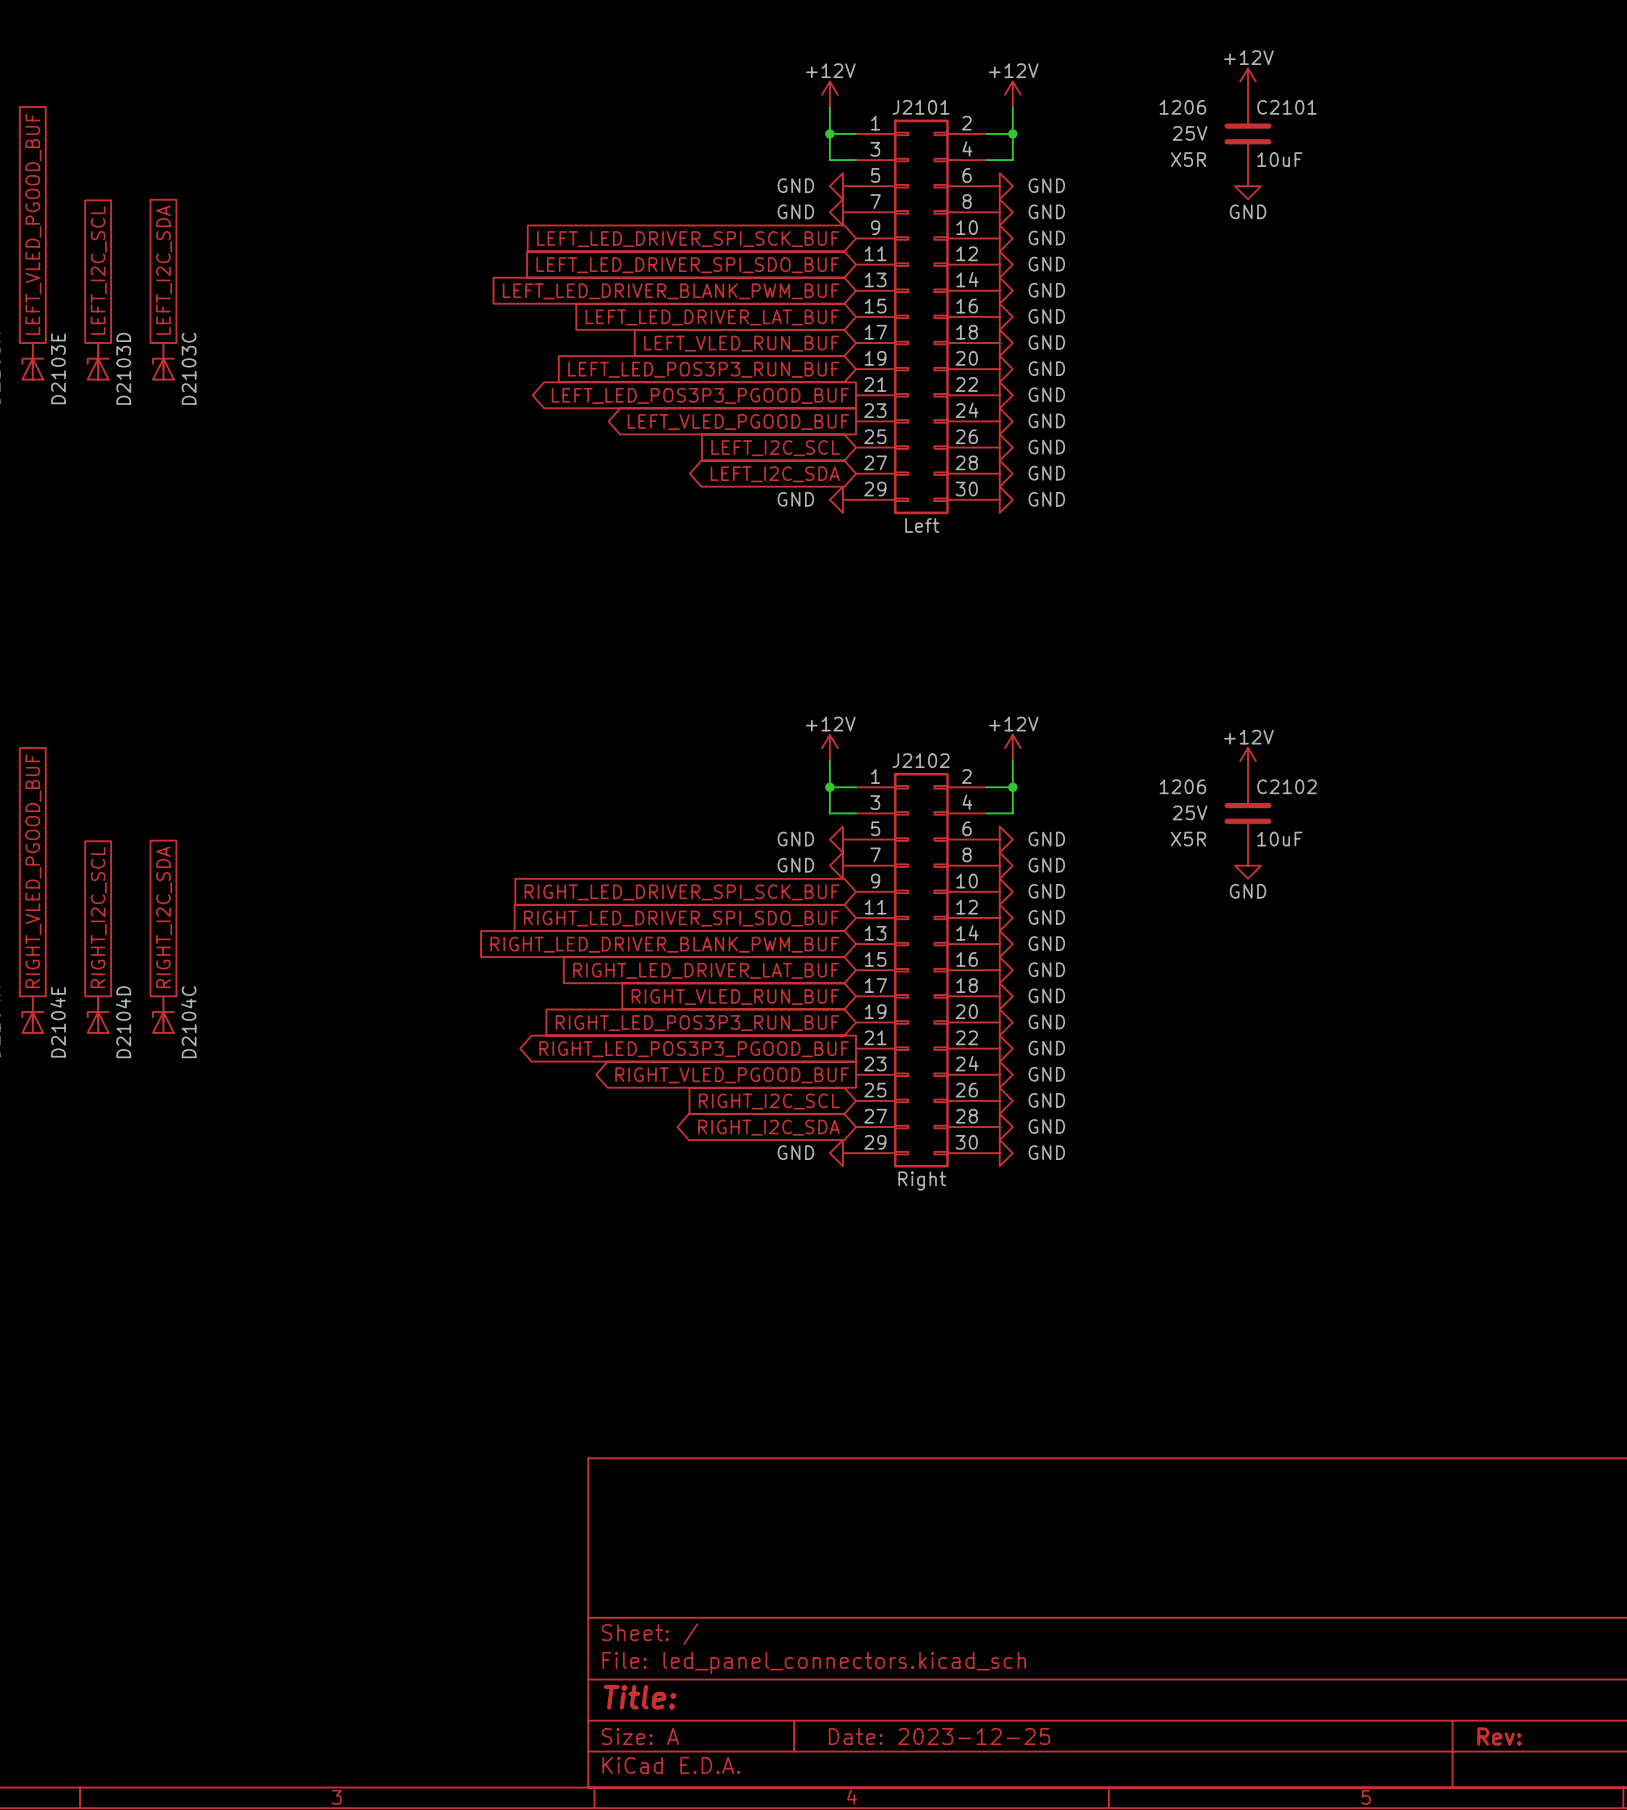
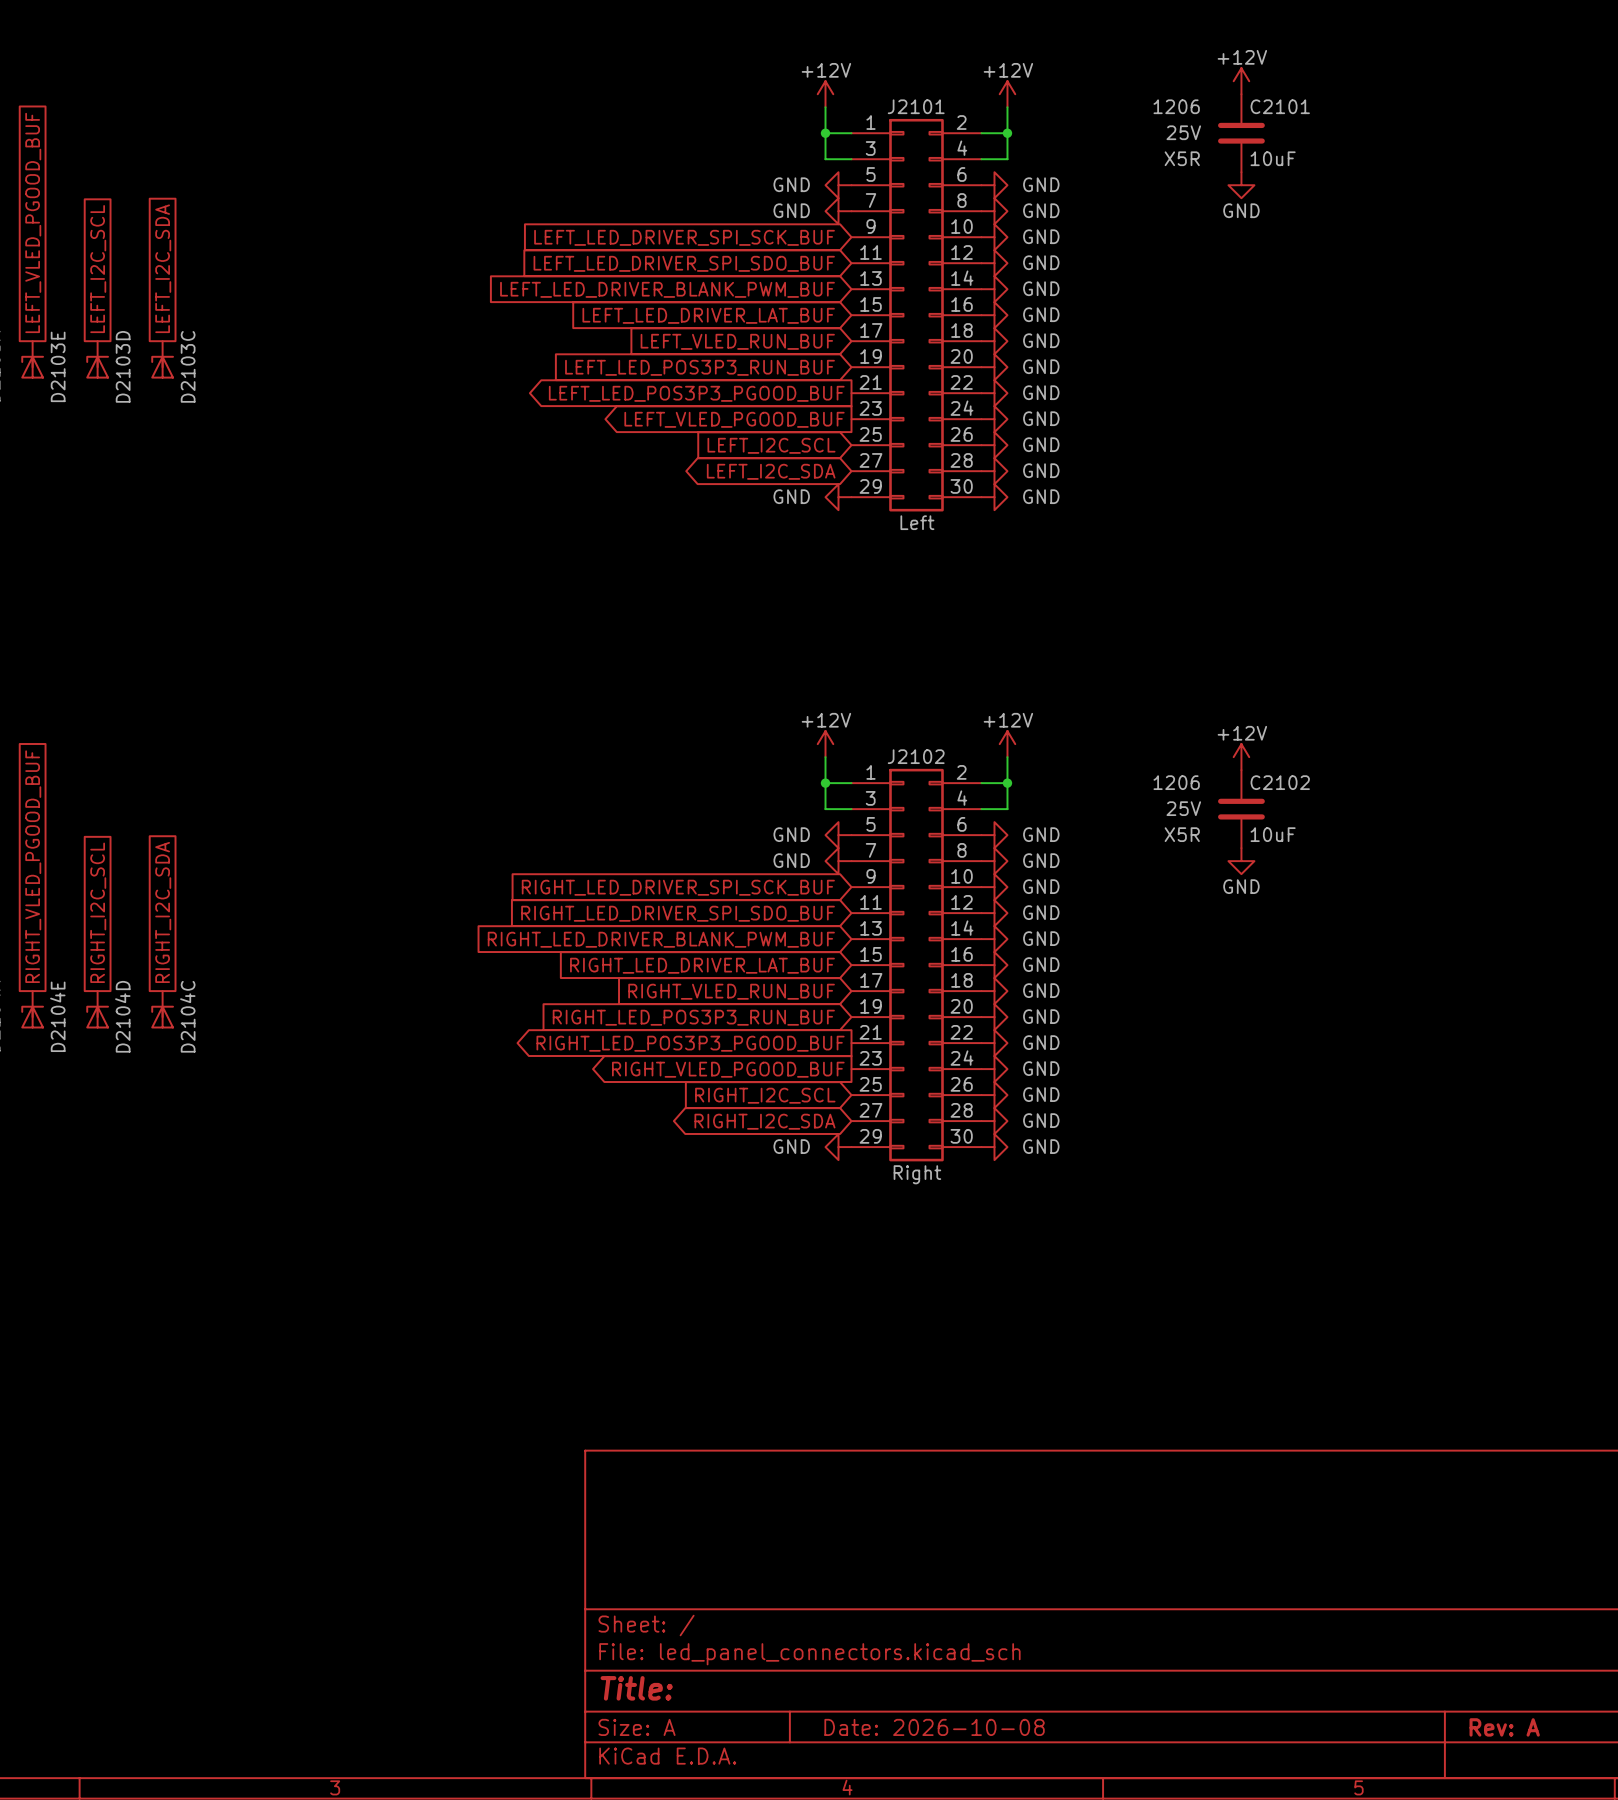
title block: Date: 2023-12-25 (939, 1736) -> Date: 2026-10-08 (934, 1727)
title block: Rev: (1499, 1736) -> Rev: A (1504, 1727)

